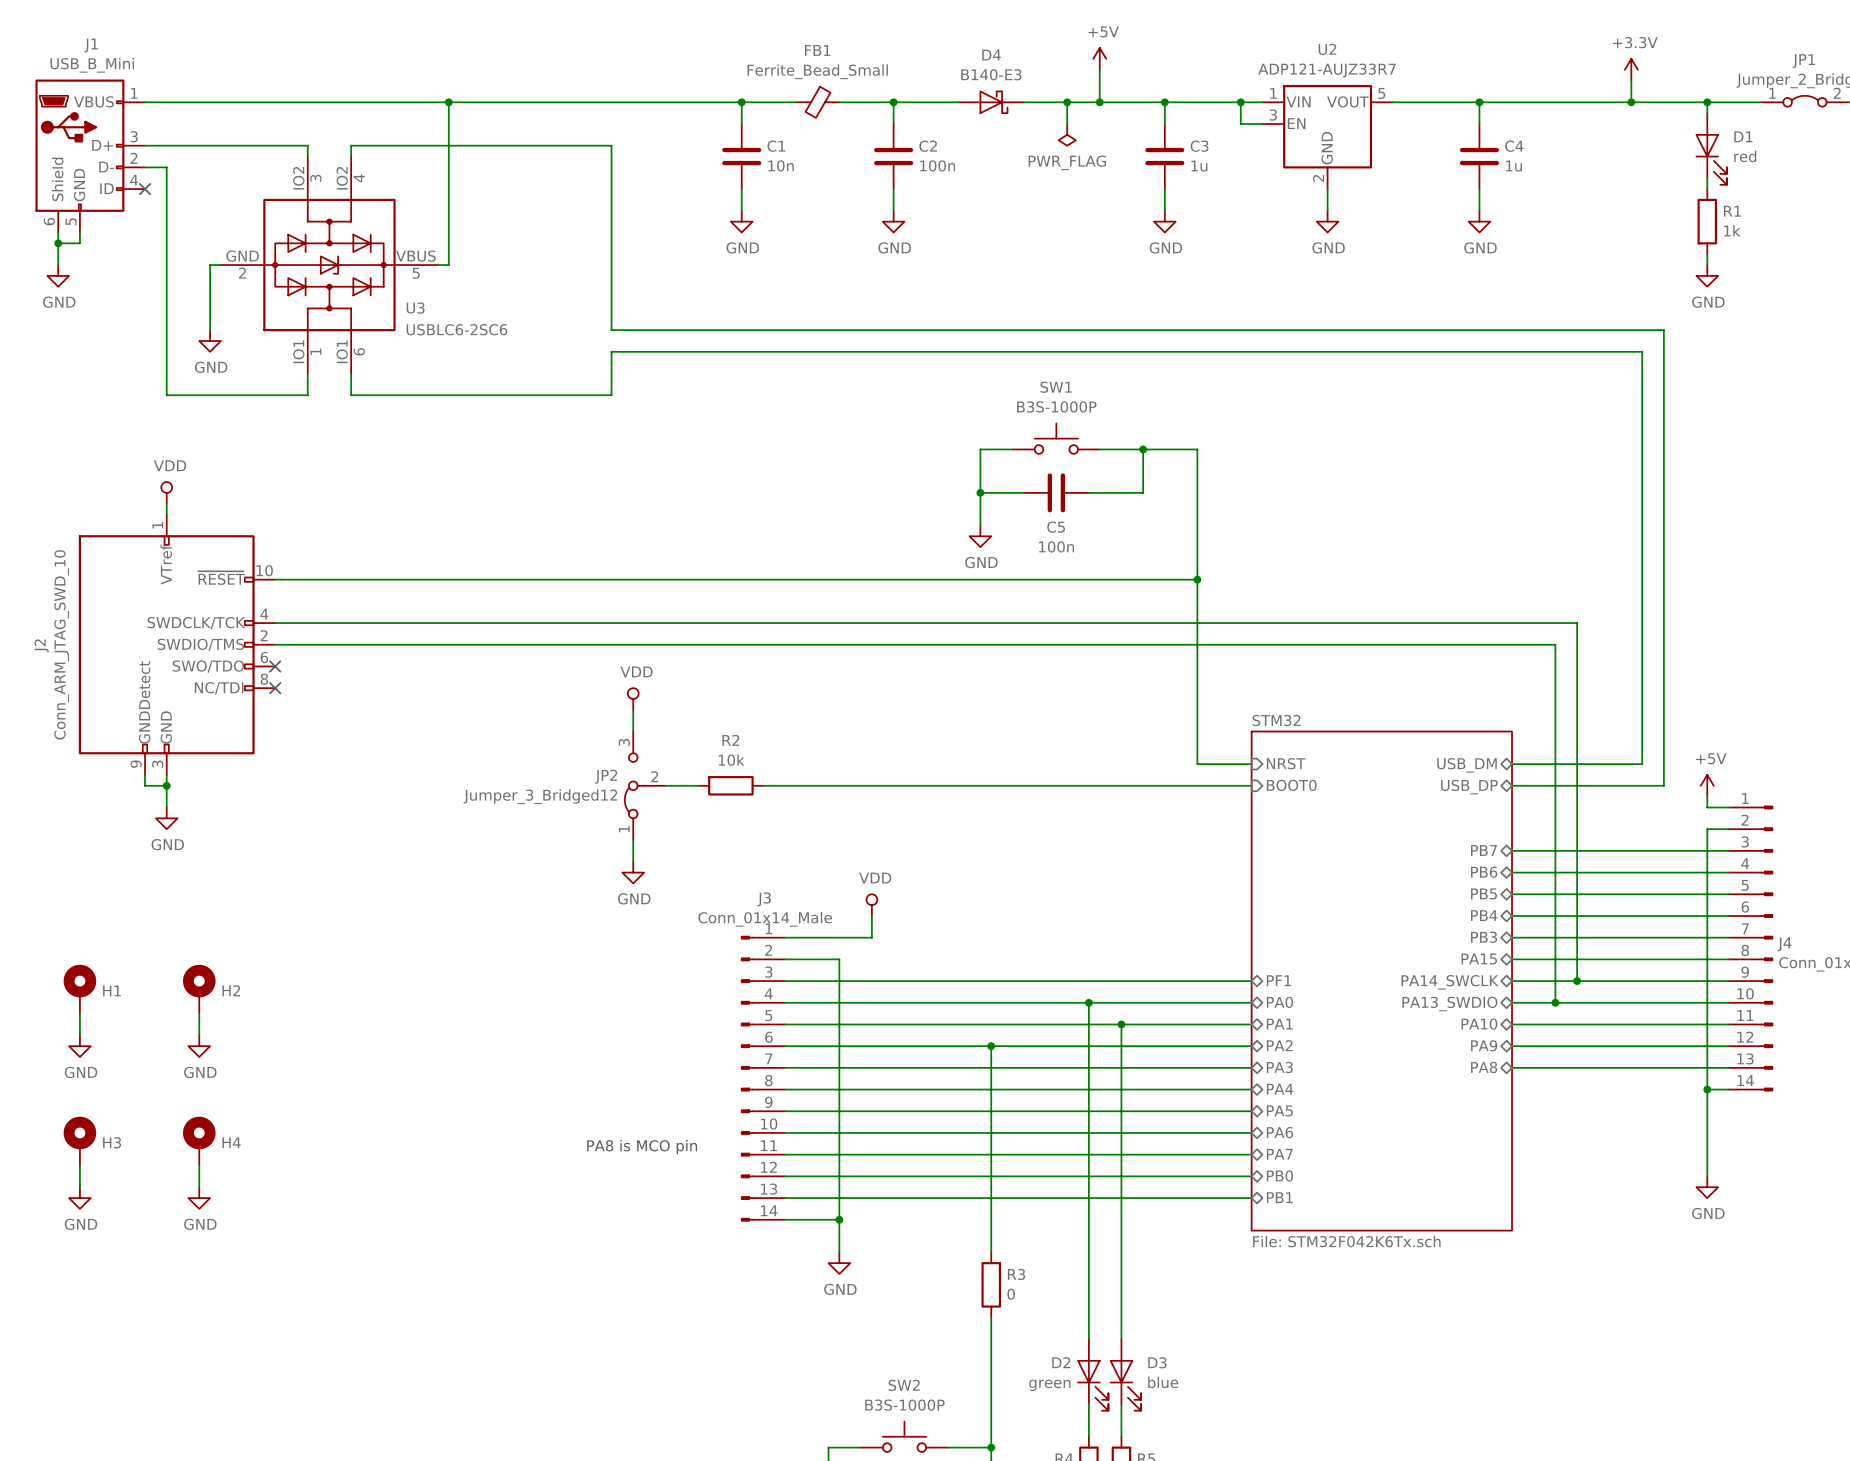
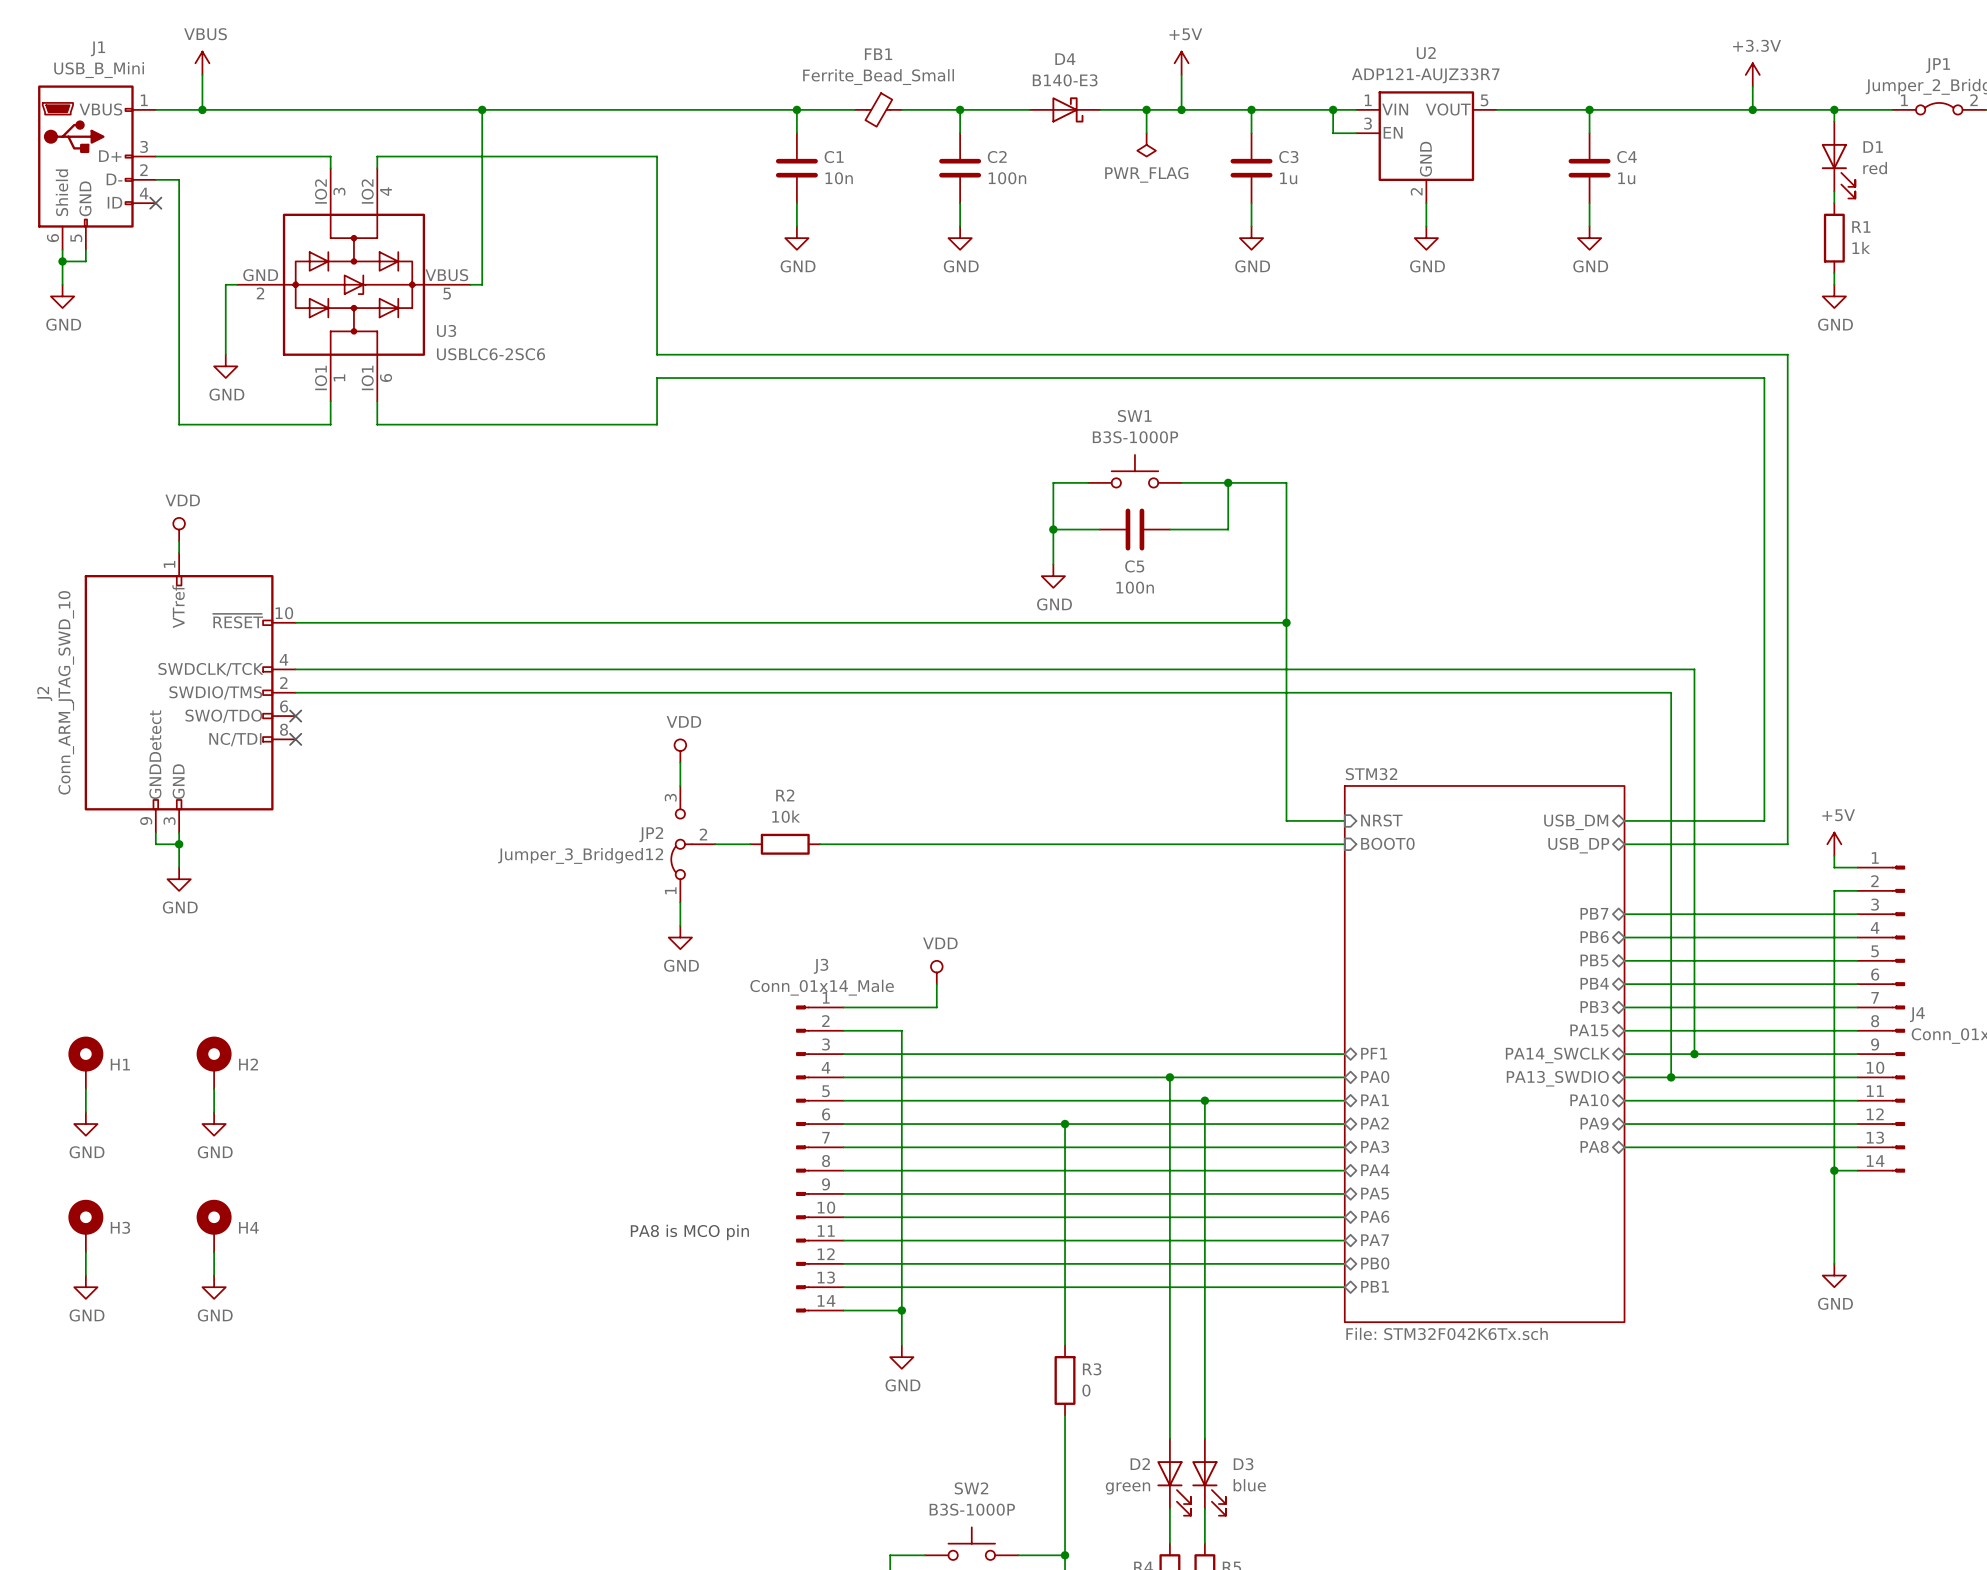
power symbol: none -> VBUS (202, 63)
wire: none -> (202, 74) (202, 109)
junction: none -> (202, 109)

